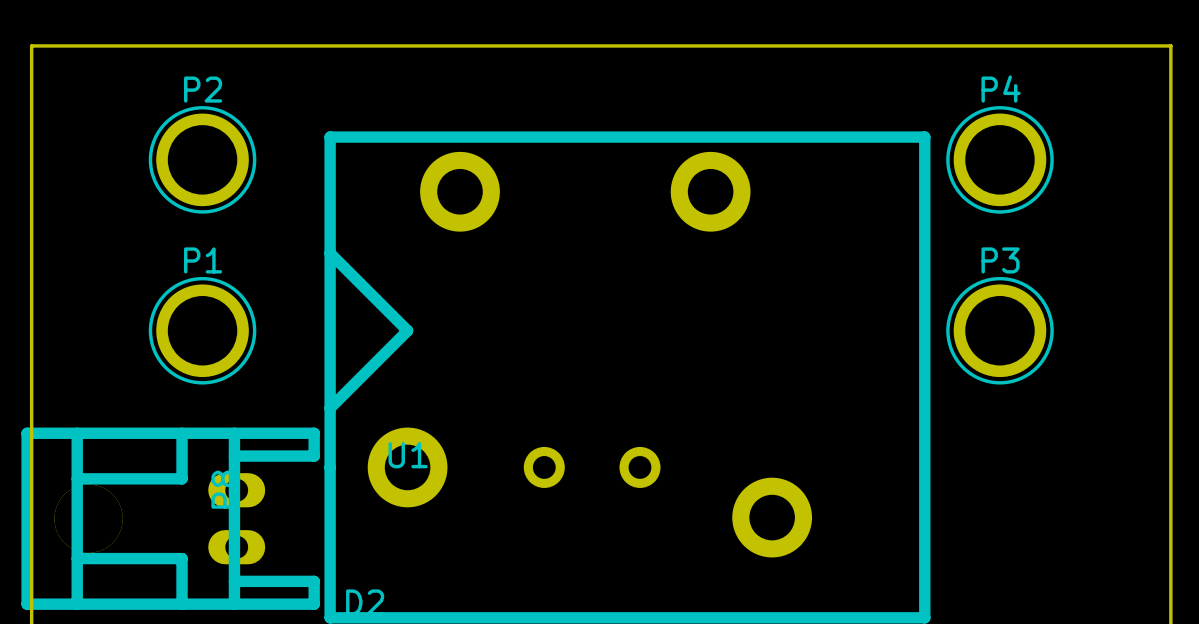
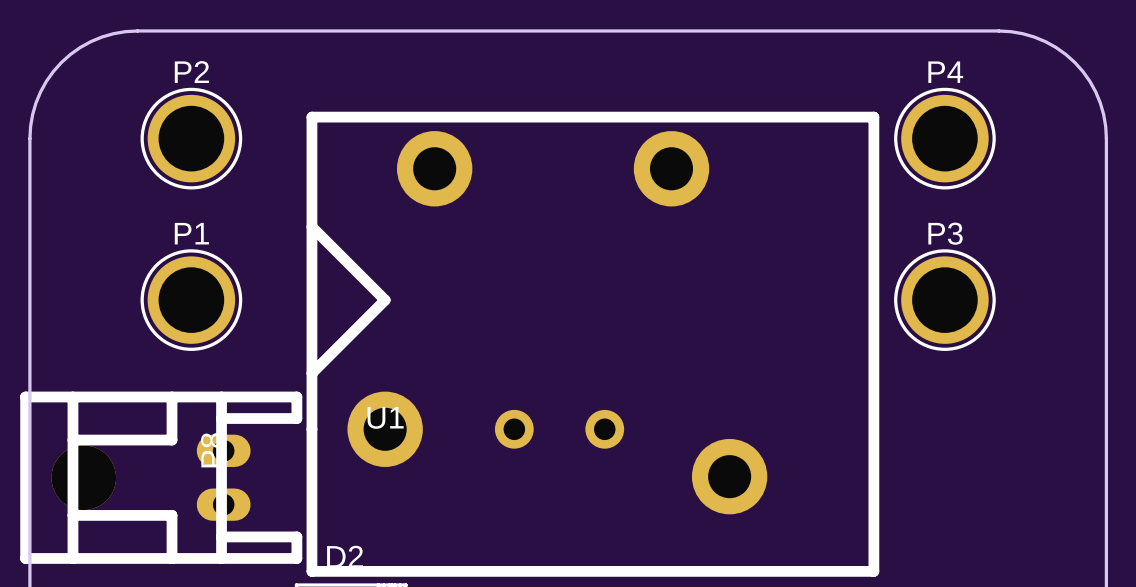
board edge: (145, 45) (31, 45) (31, 159) -> (137, 30) (102, 37) (80, 47) (61, 62) (40, 91) (32, 114) (29, 138)
board edge: (1056, 45) (1170, 45) (1170, 159) -> (998, 30) (1022, 33) (1045, 41) (1074, 62) (1095, 91) (1103, 114) (1106, 138)

